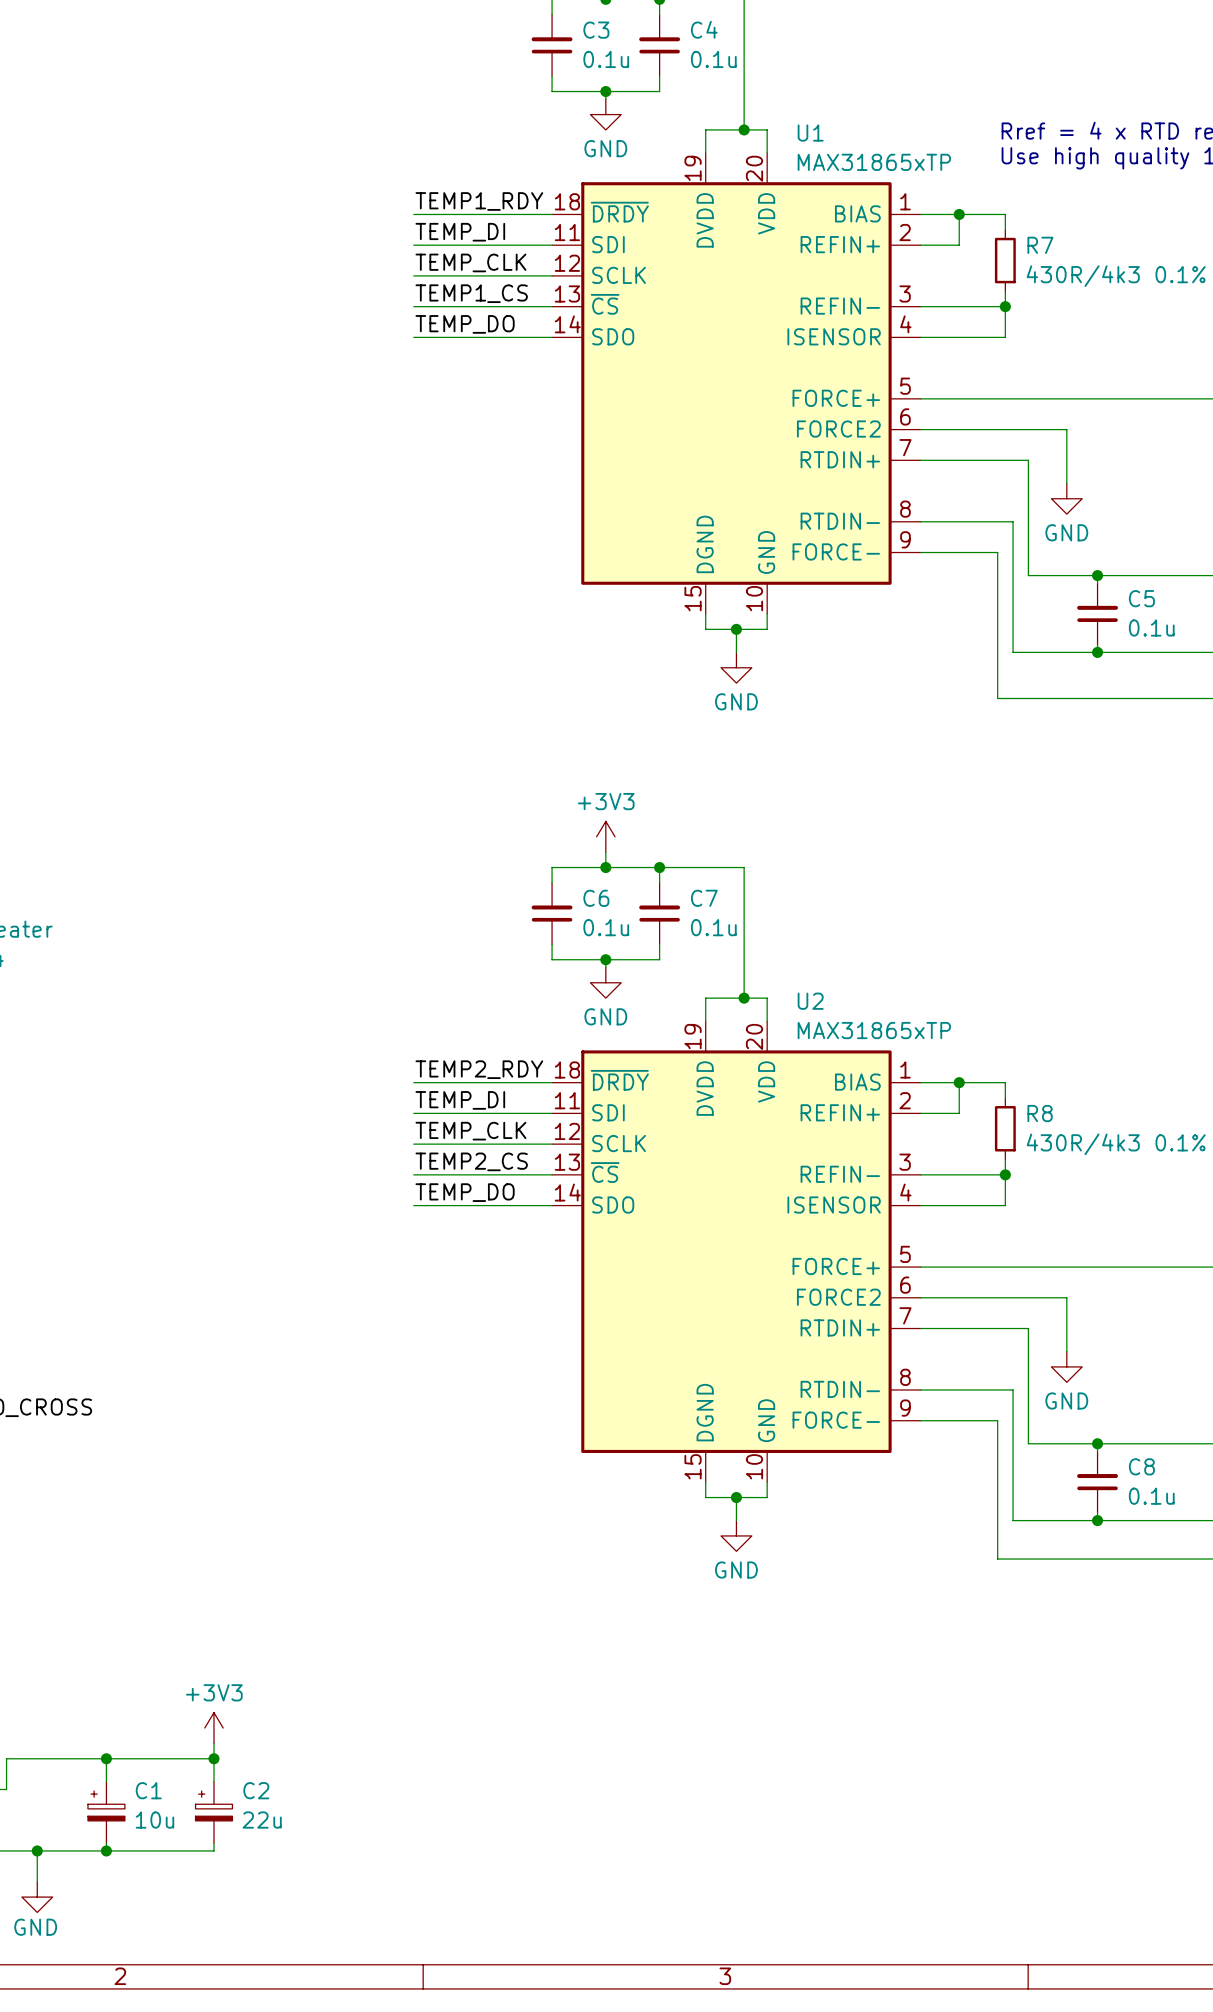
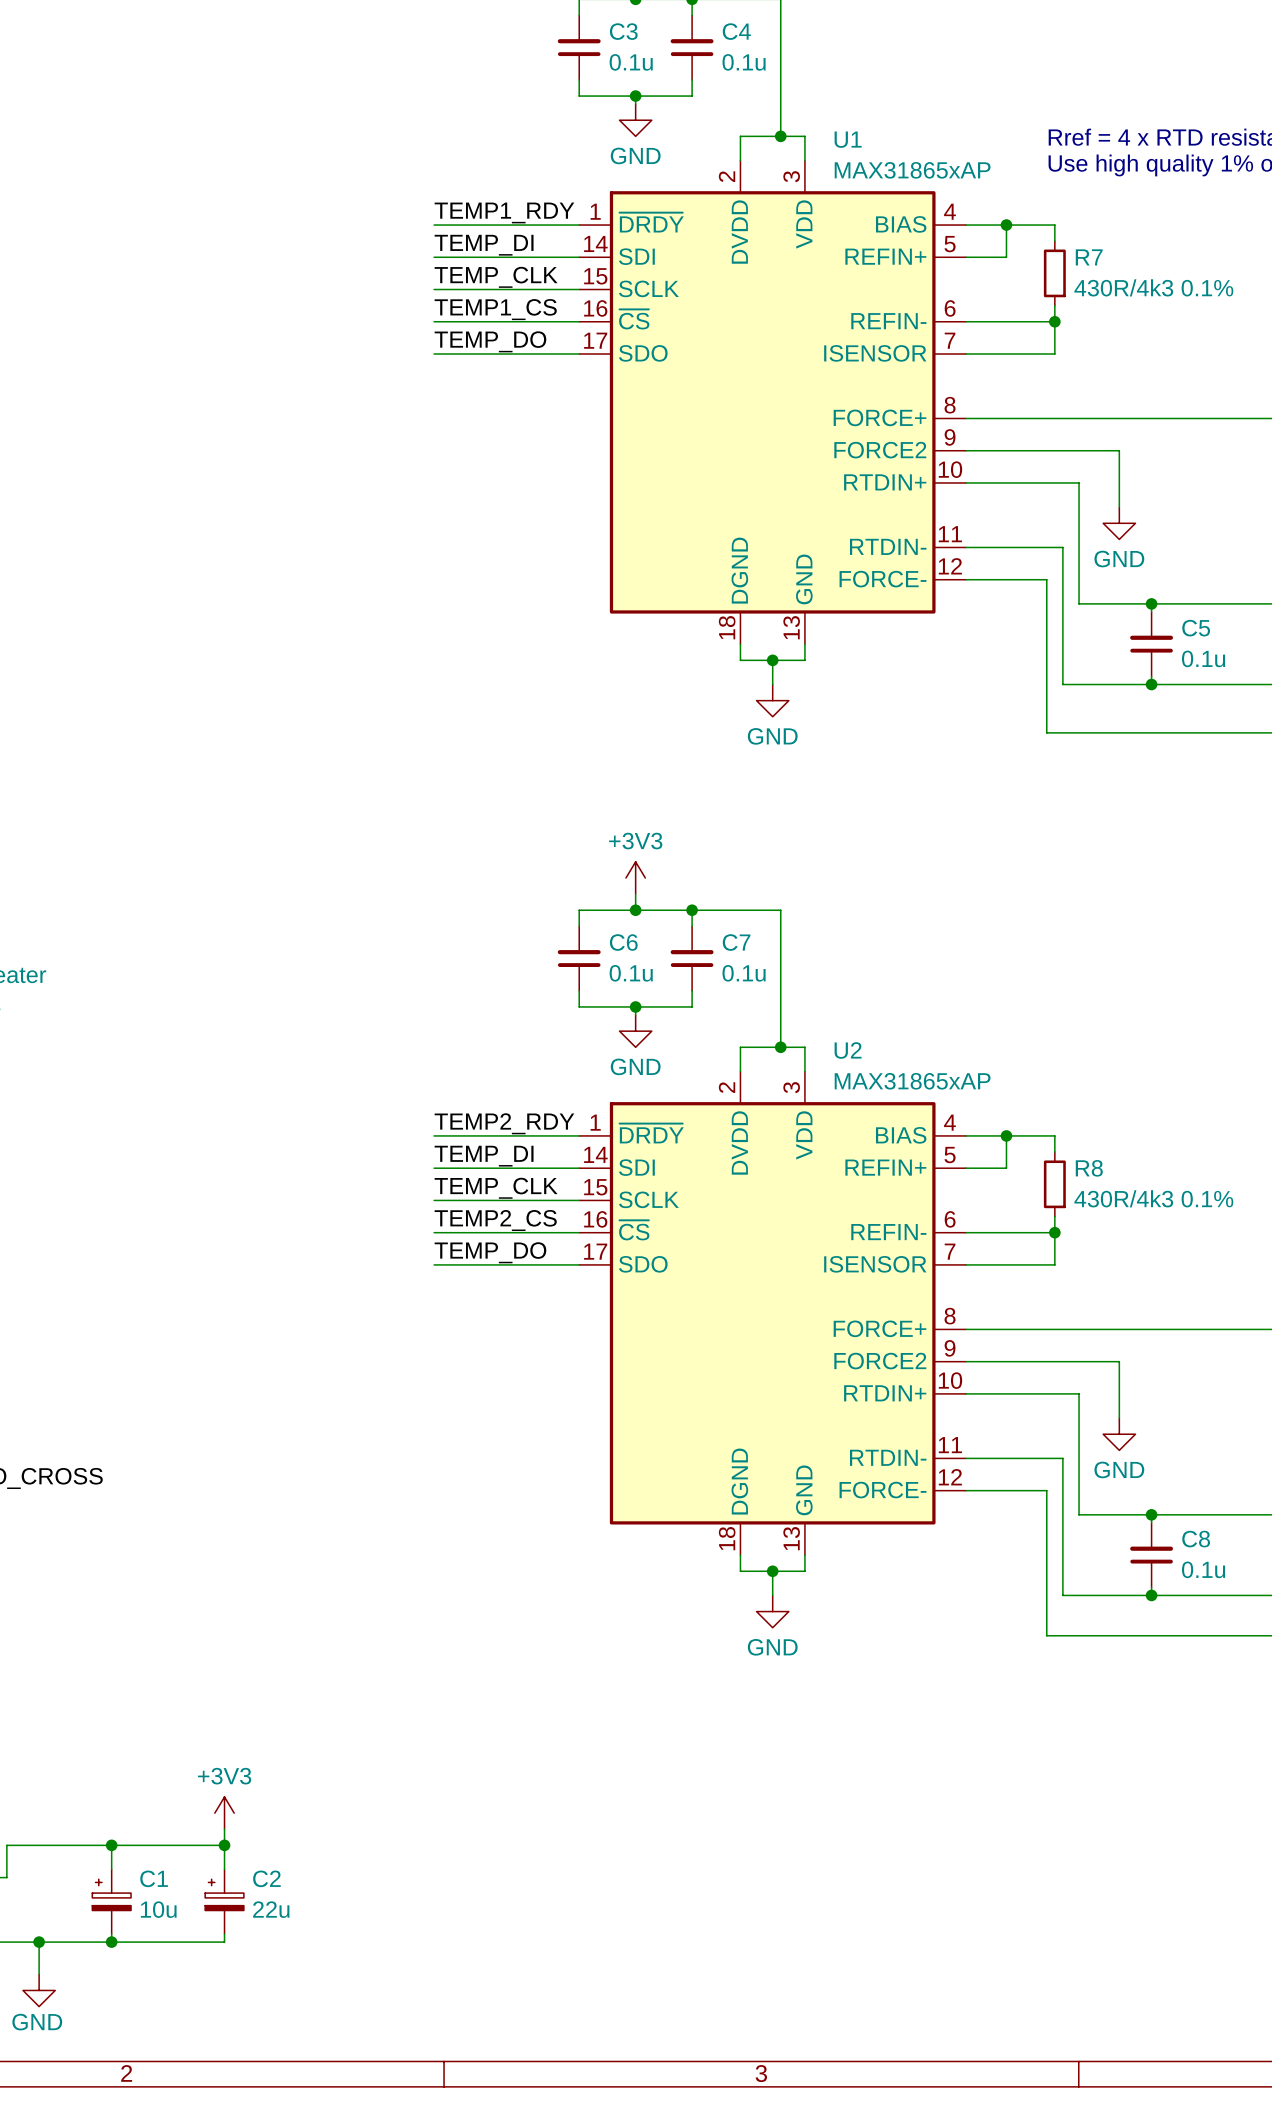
U1 symbol: [552, 153, 921, 614] -> [579, 160, 967, 645]
U1 value: MAX31865xTP (874, 162) -> MAX31865xAP (912, 170)
U2 symbol: [552, 1021, 921, 1483] -> [579, 1071, 967, 1556]
U2 value: MAX31865xTP (874, 1030) -> MAX31865xAP (912, 1081)

